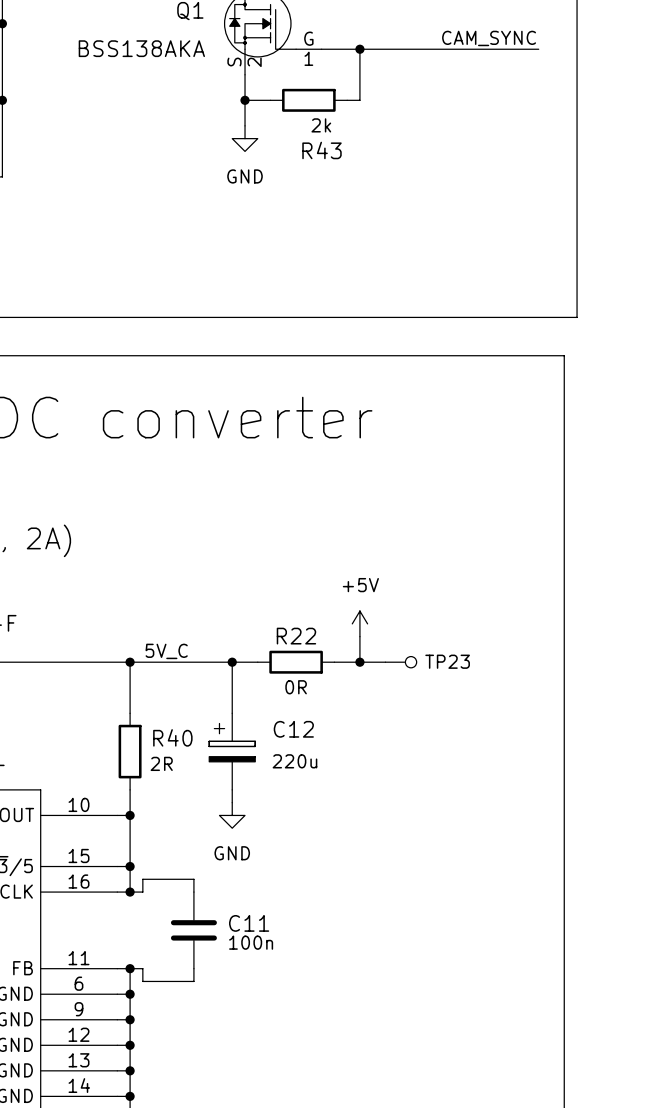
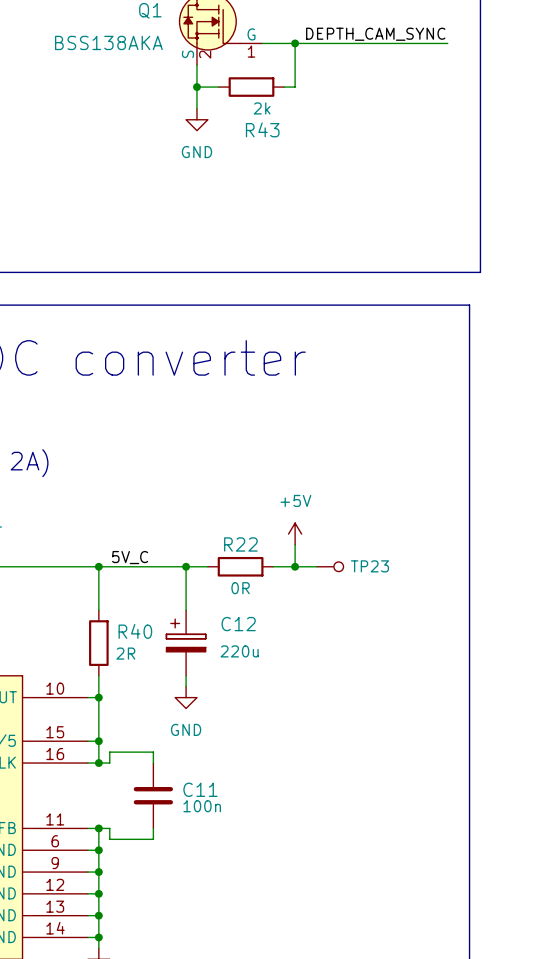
label: CAM_SYNC (489, 38) -> DEPTH_CAM_SYNC (375, 34)

